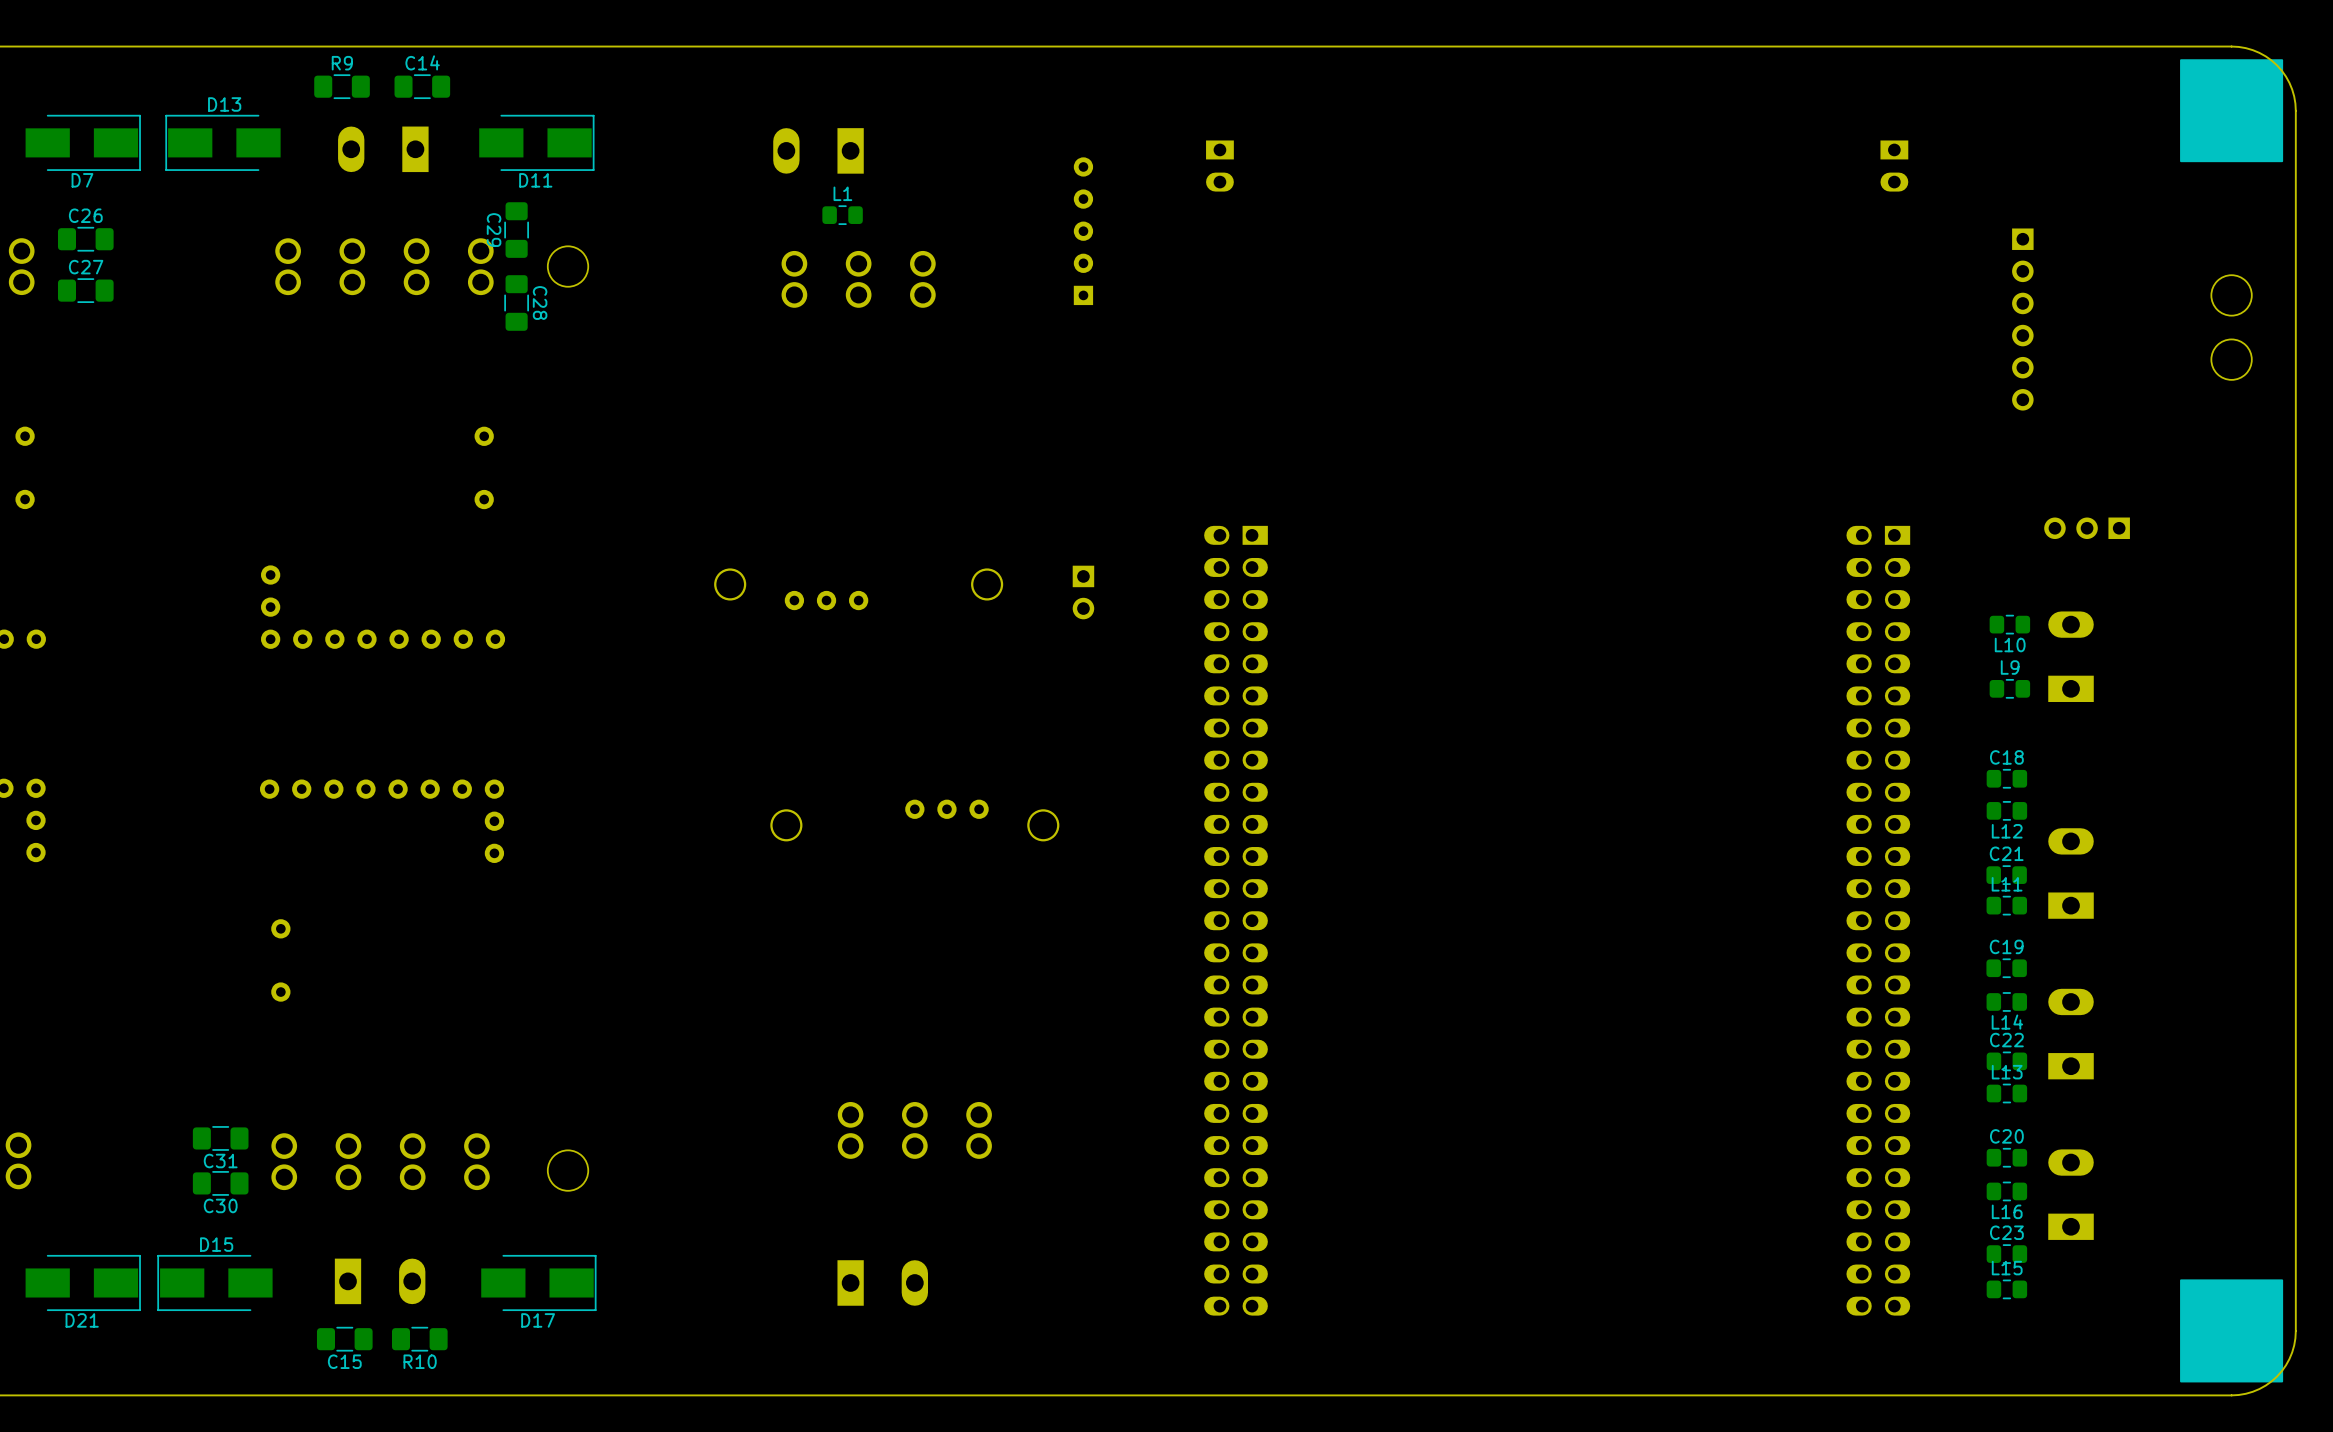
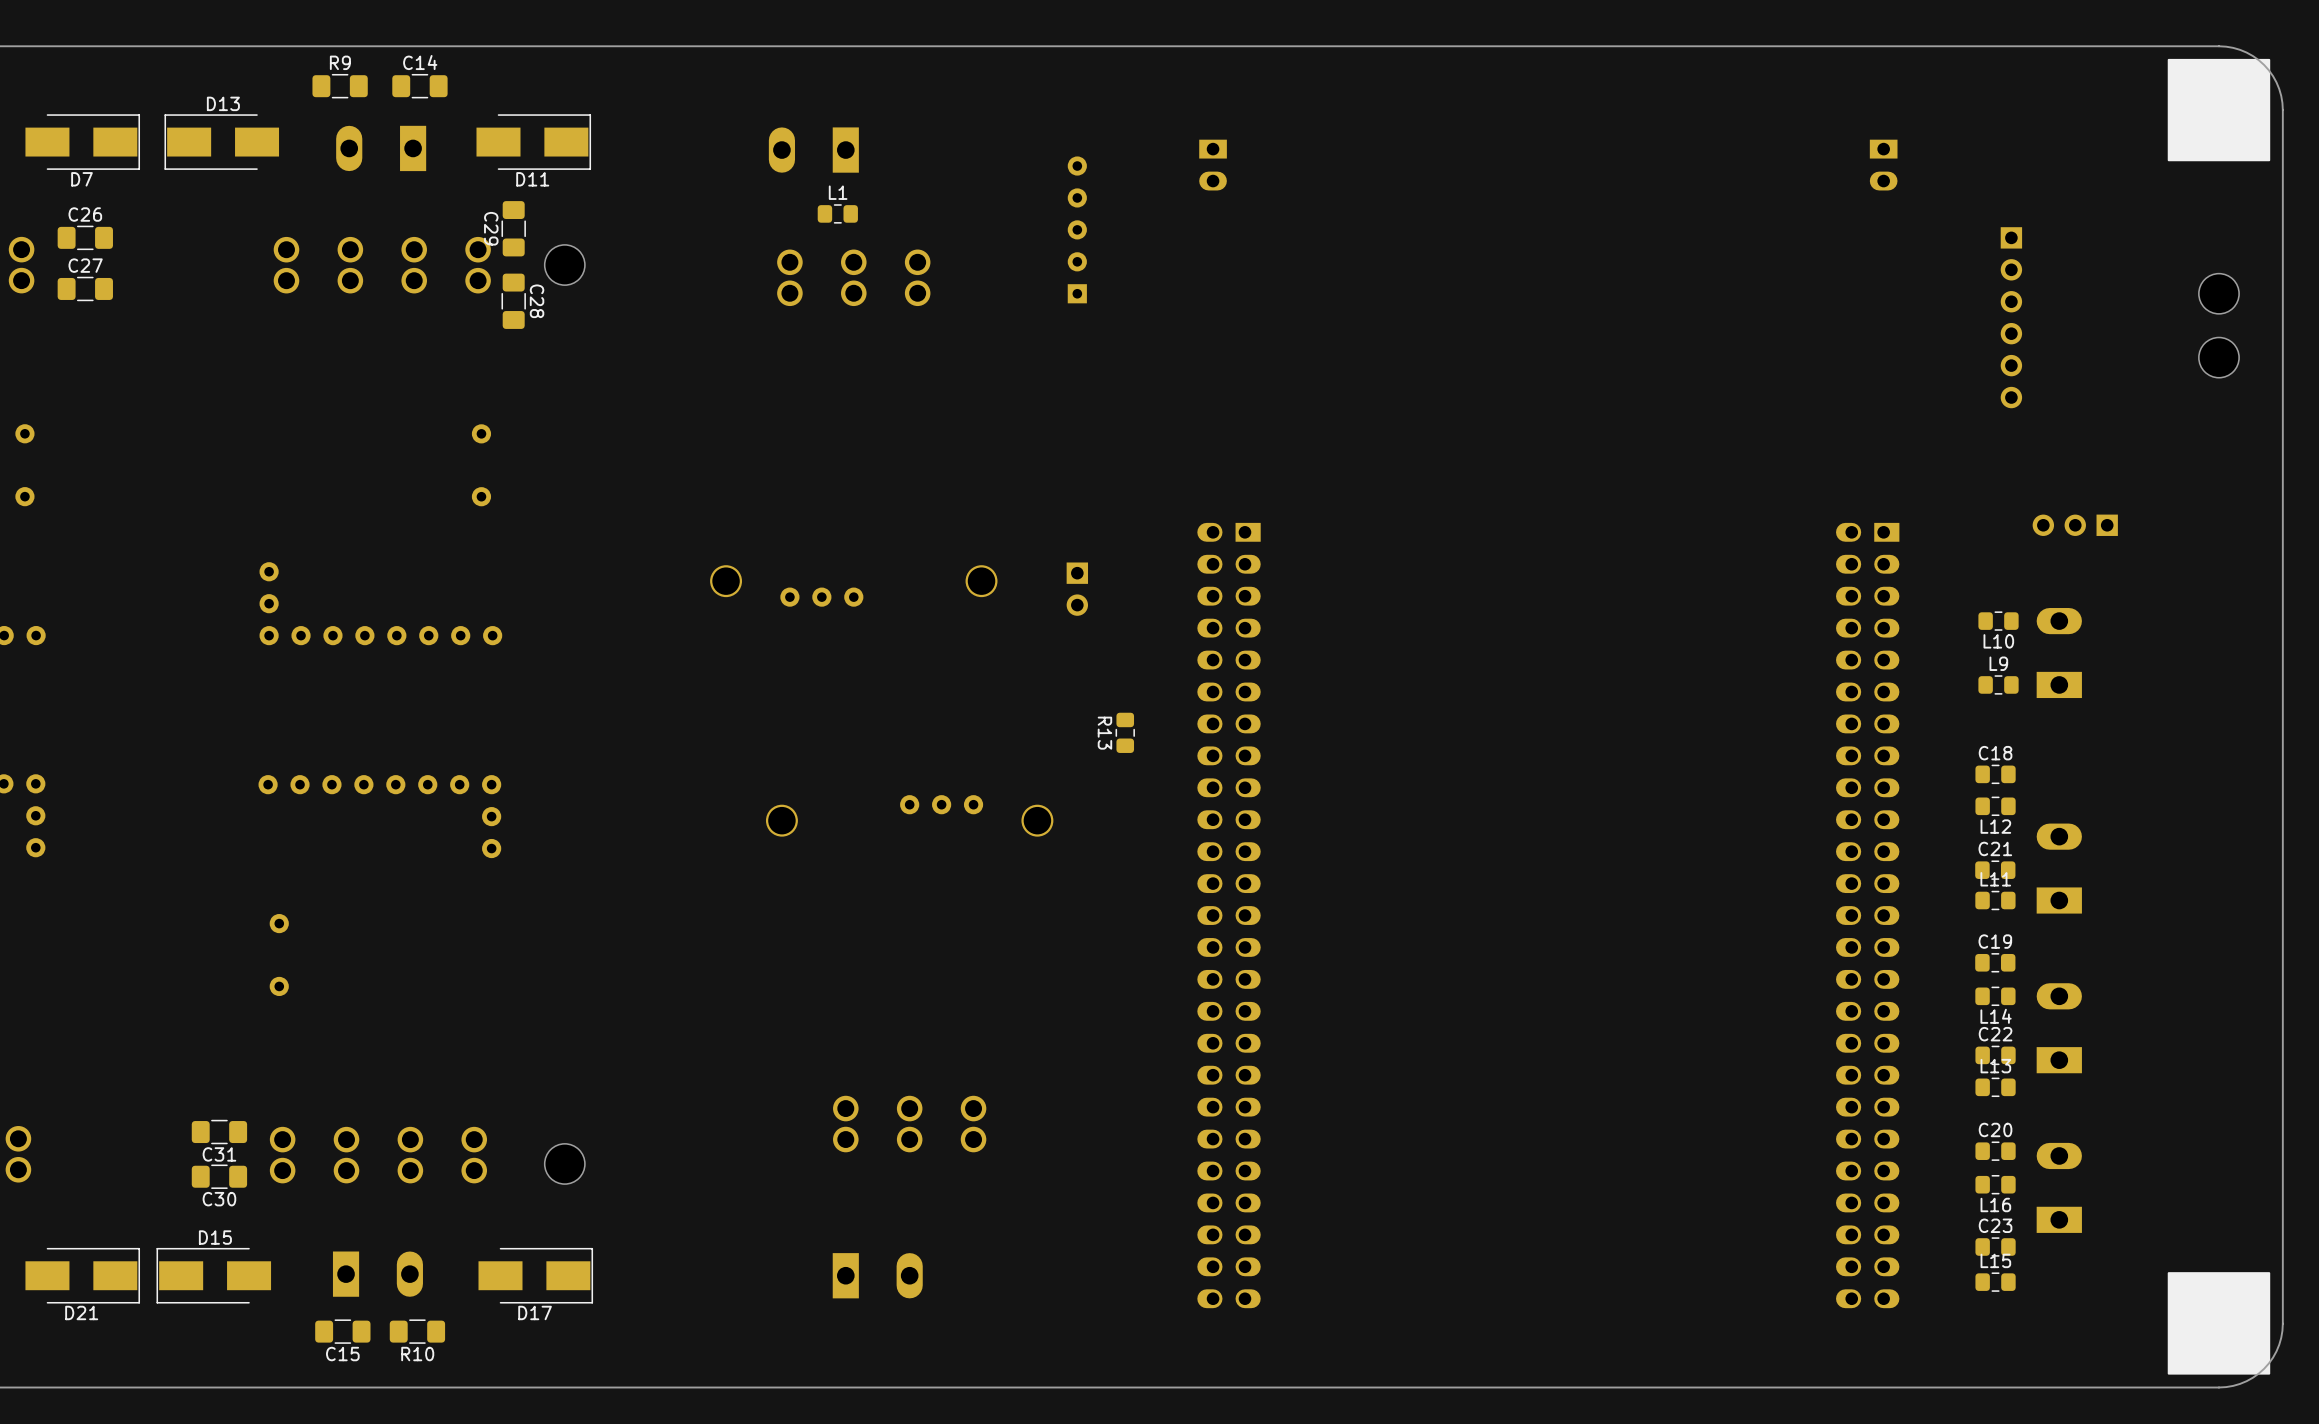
R13: none -> (1125, 732)

